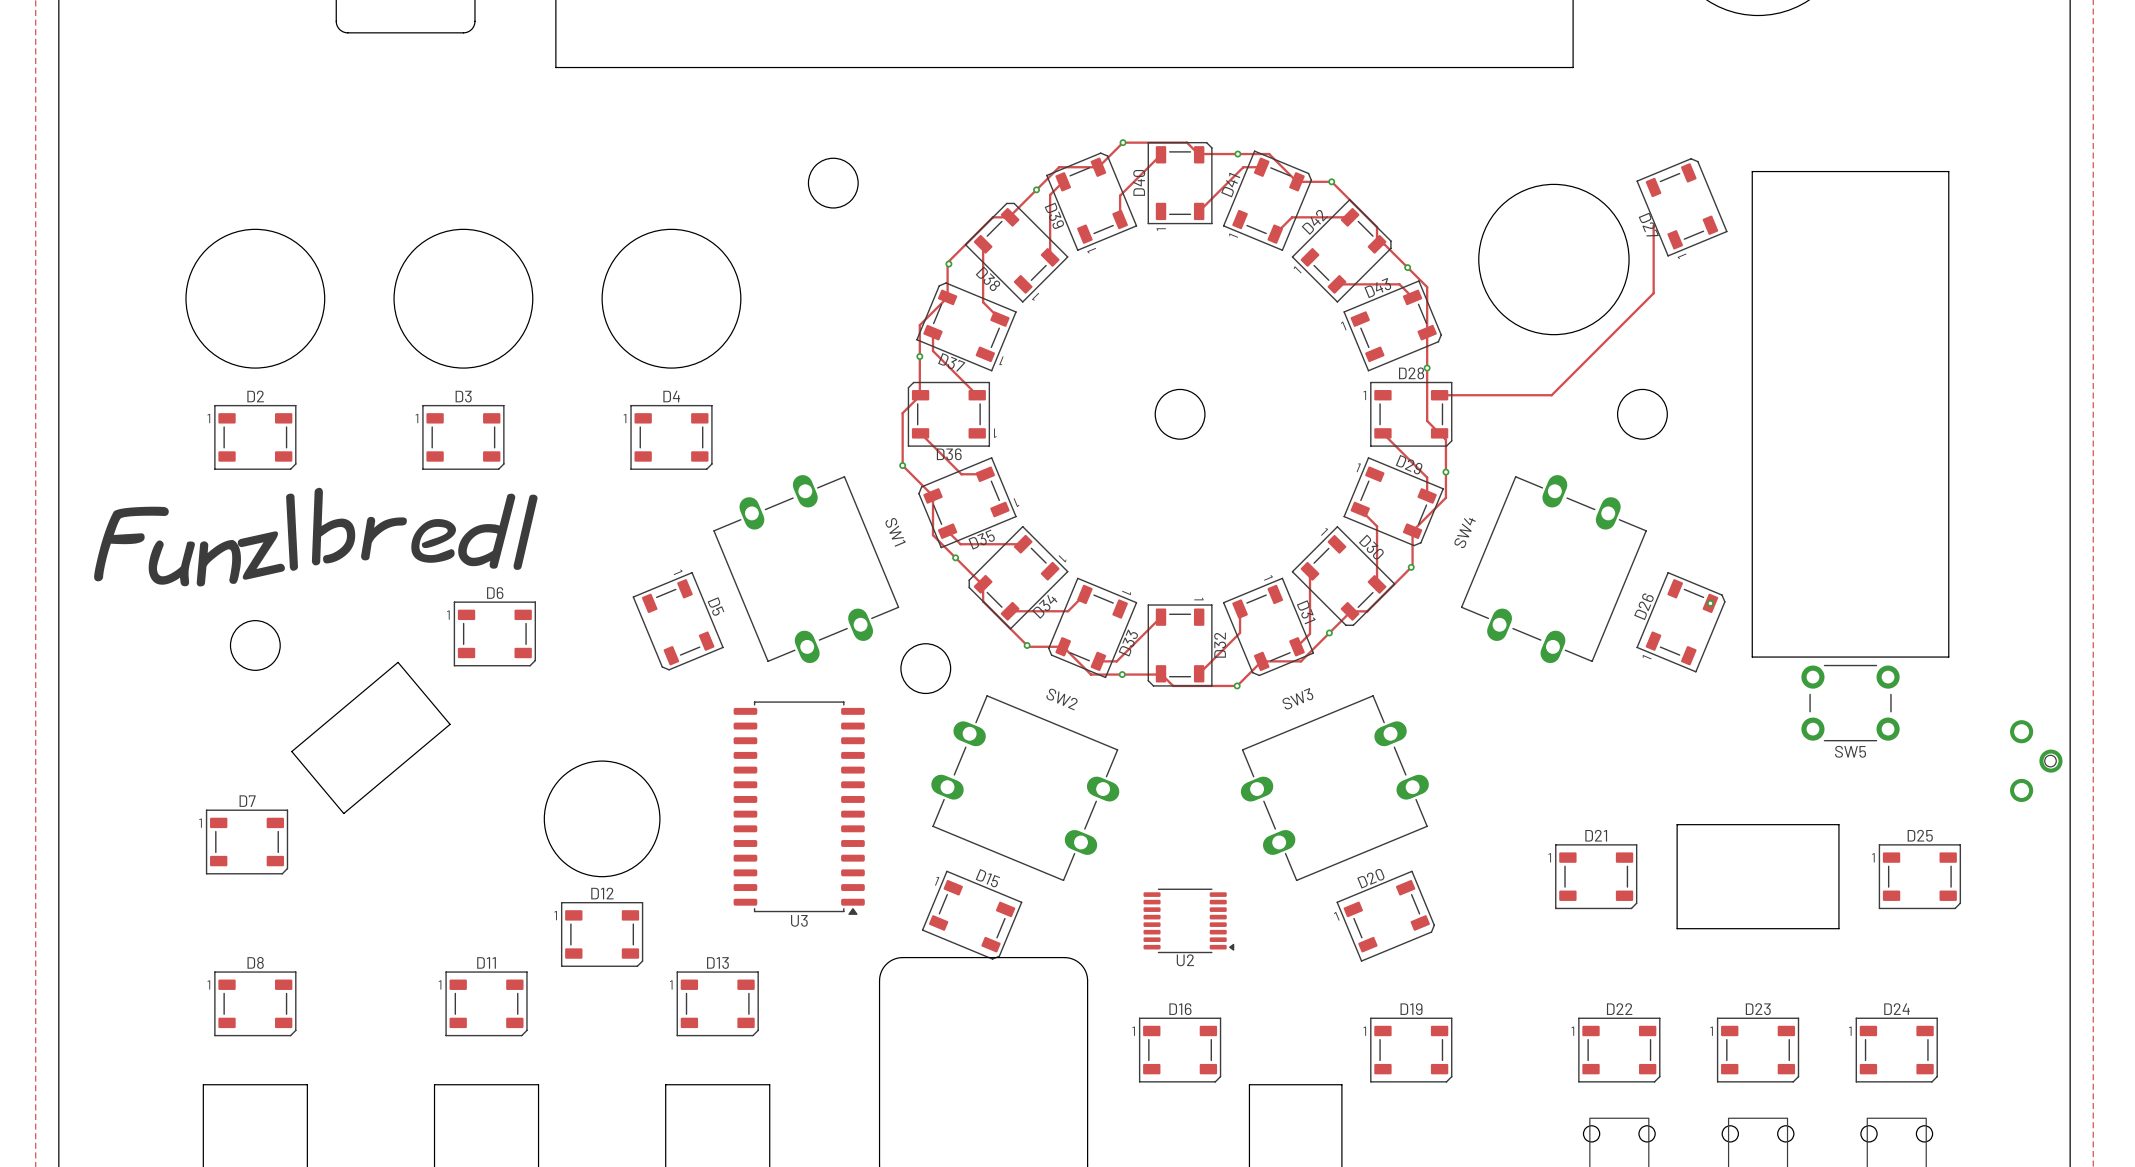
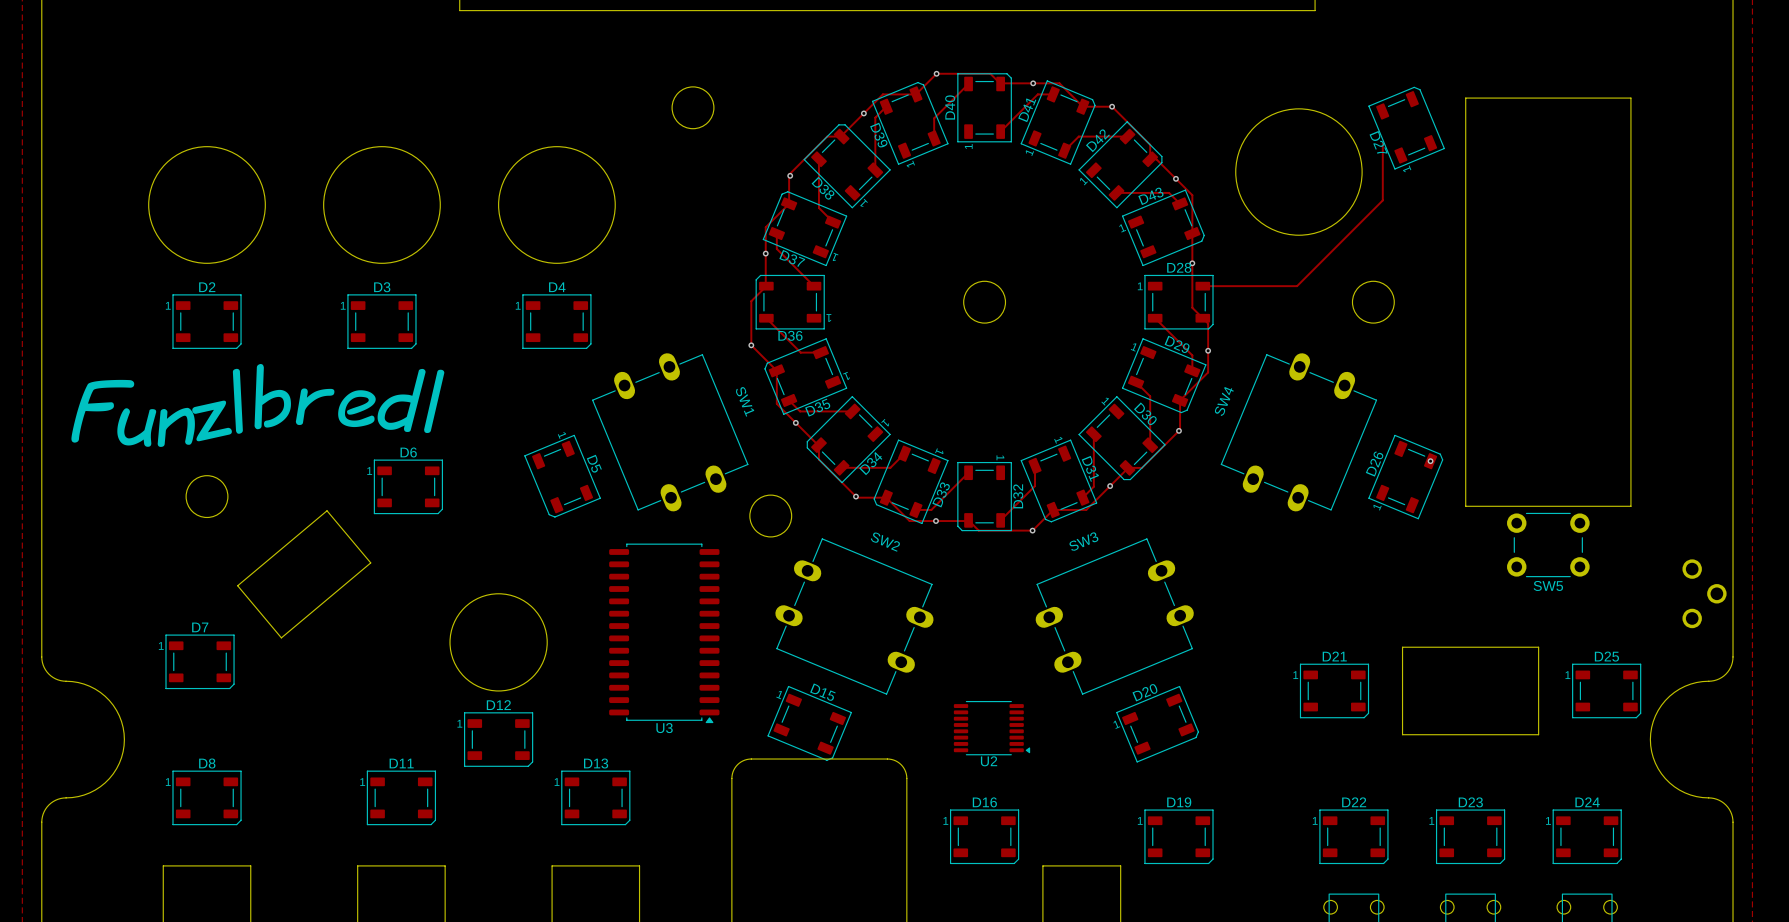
drawing: [2044, 754, 2057, 768] -> none
board edge: (58, 836) (58, 1032) -> (41, 656) (44, 667) (53, 677) (84, 684) (105, 696) (119, 715) (124, 739) (119, 763) (105, 782) (84, 795) (53, 801) (45, 809) (41, 822)
board edge: (2070, 836) (2070, 1032) -> (1733, 656) (1729, 669) (1721, 677) (1684, 686) (1665, 700) (1655, 715) (1650, 739) (1655, 763) (1665, 778) (1684, 792) (1721, 801) (1729, 809) (1733, 822)

